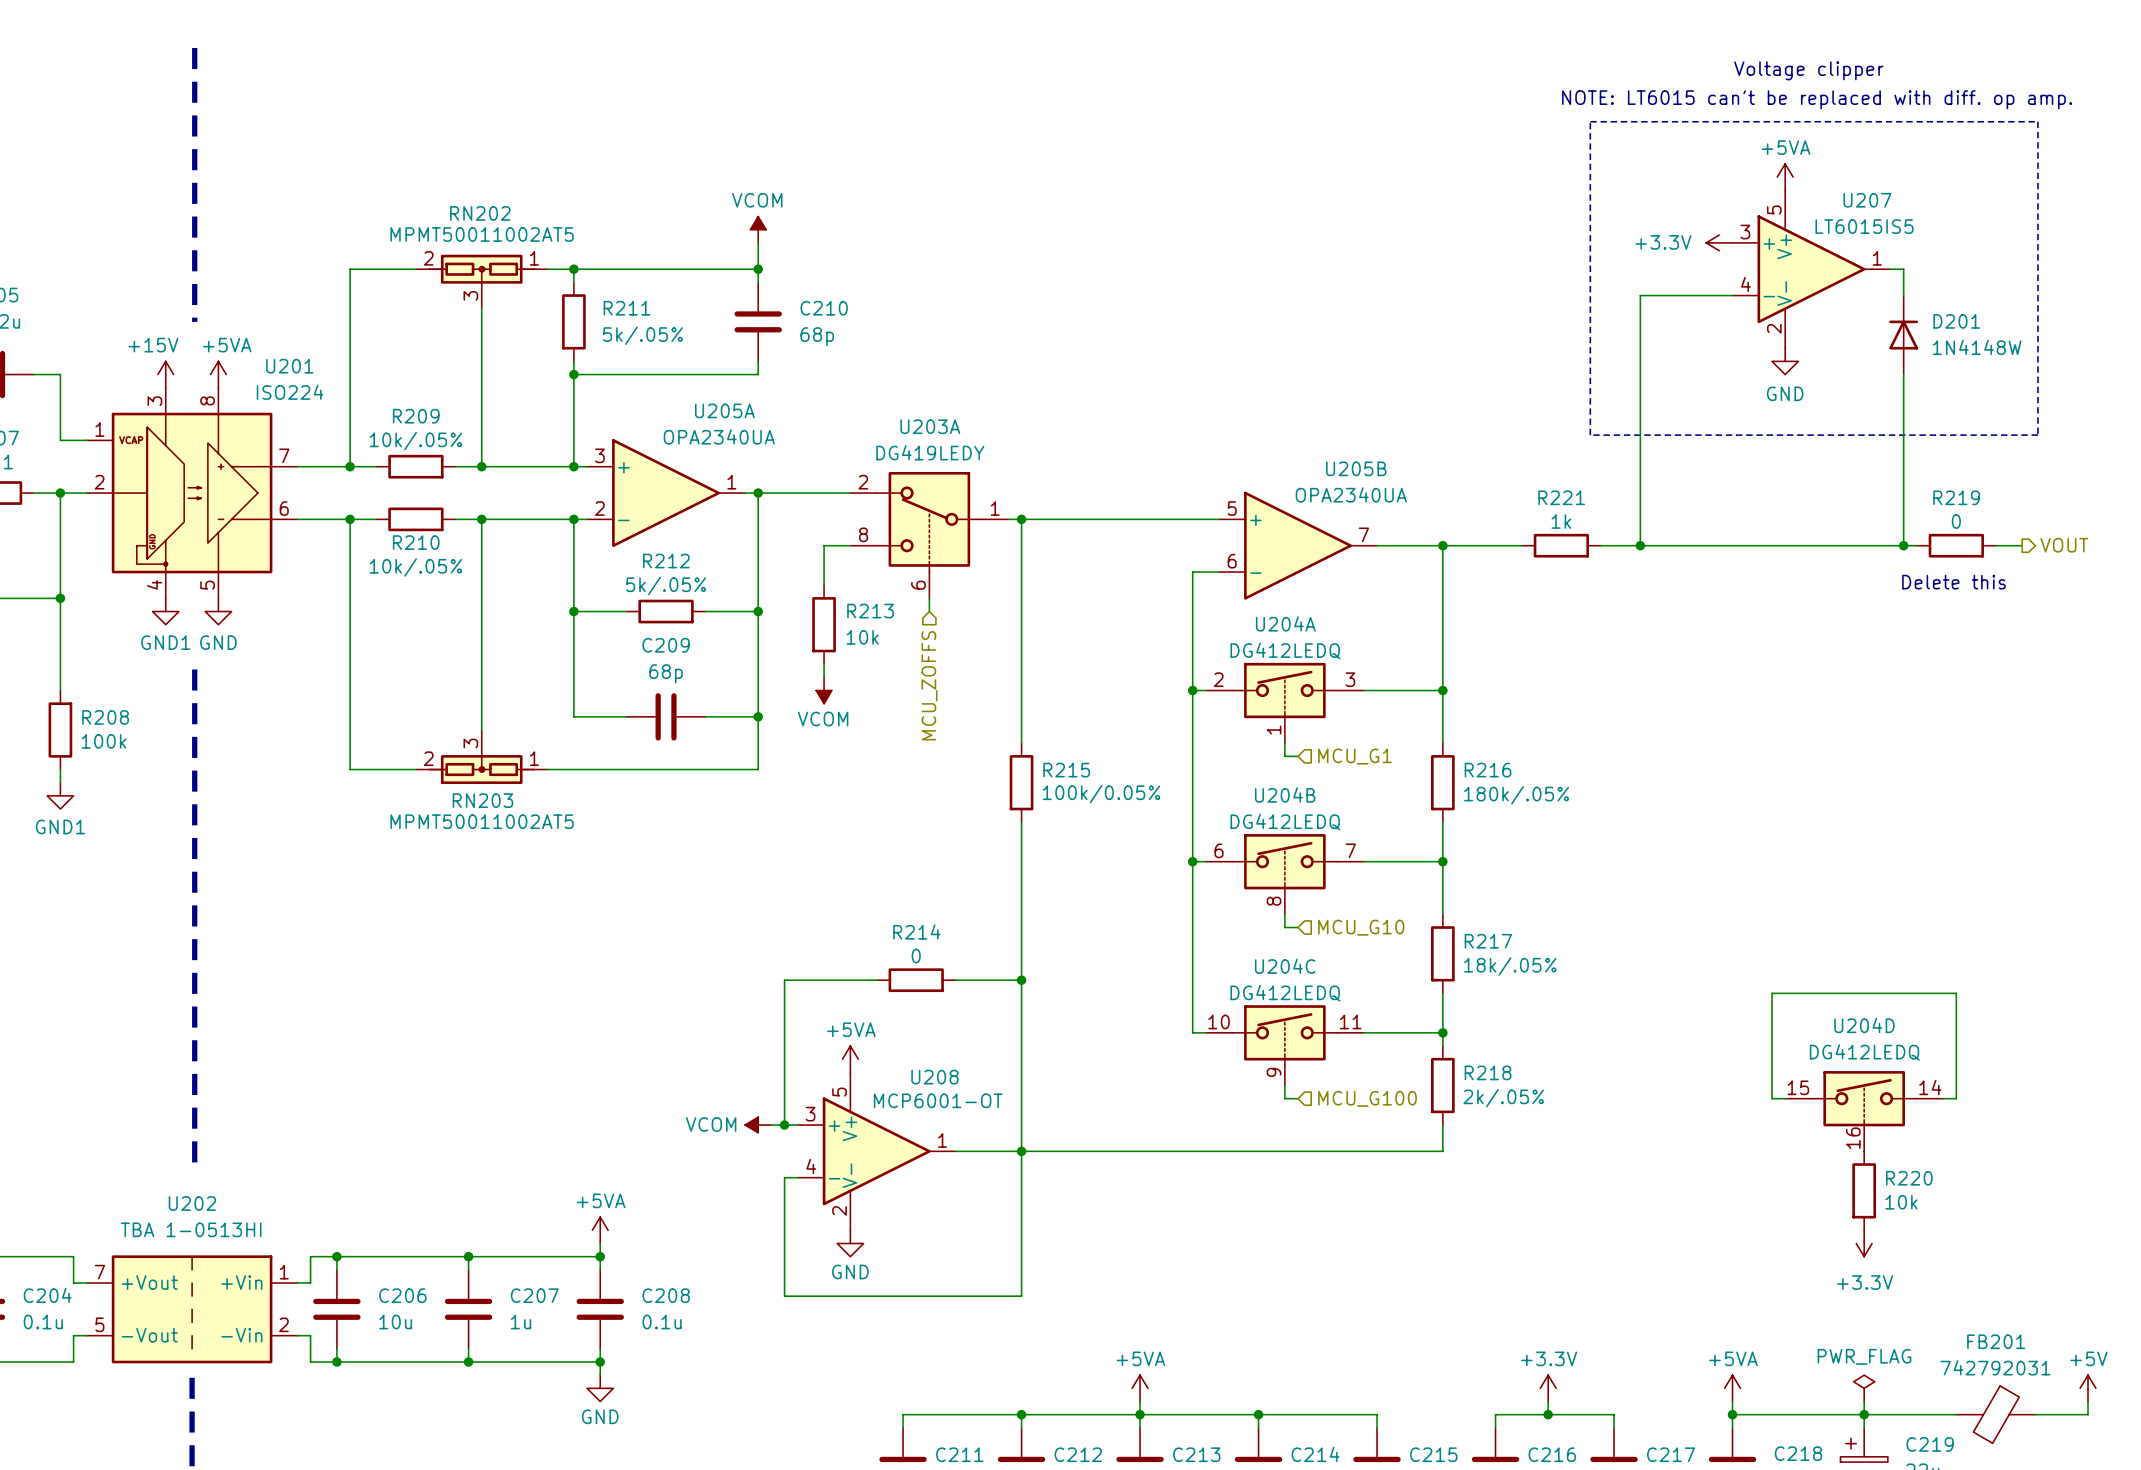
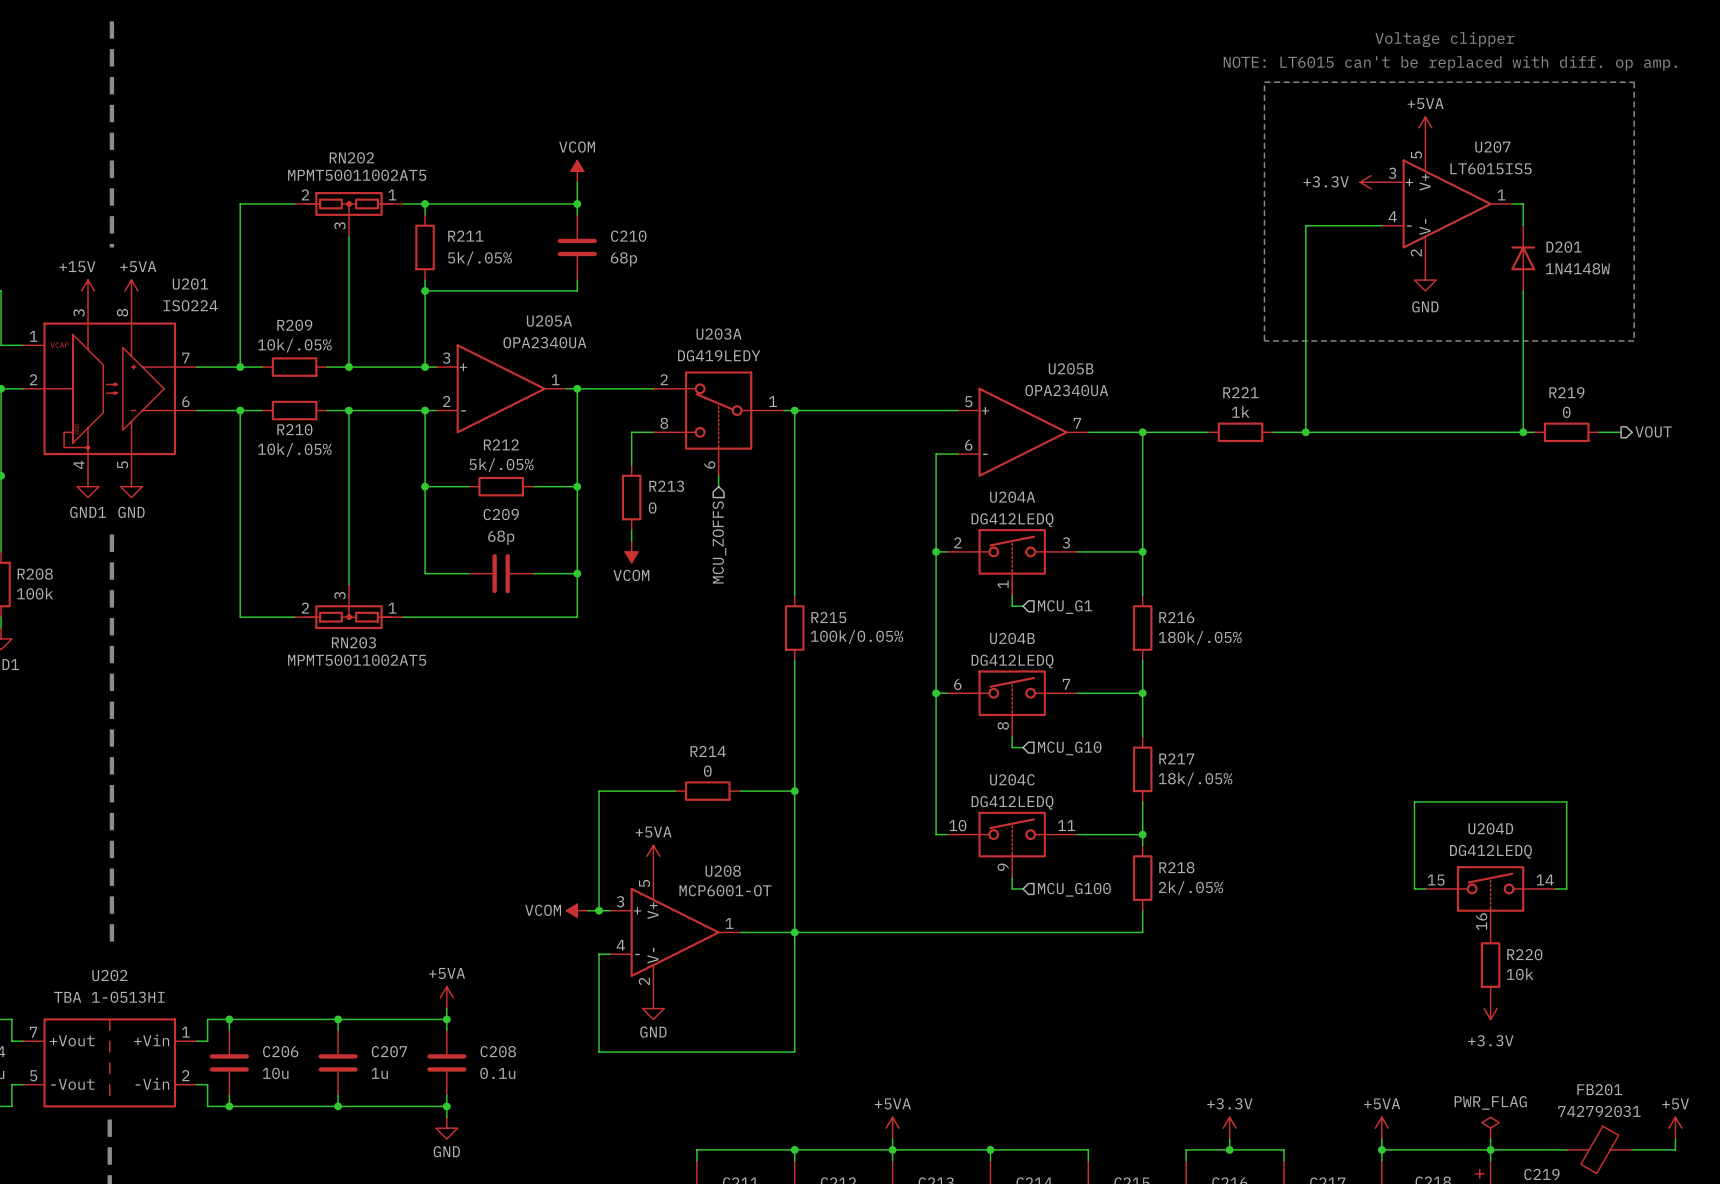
text: Delete this (1954, 582) -> none
R213 value: 10k (862, 637) -> 0 (652, 508)

